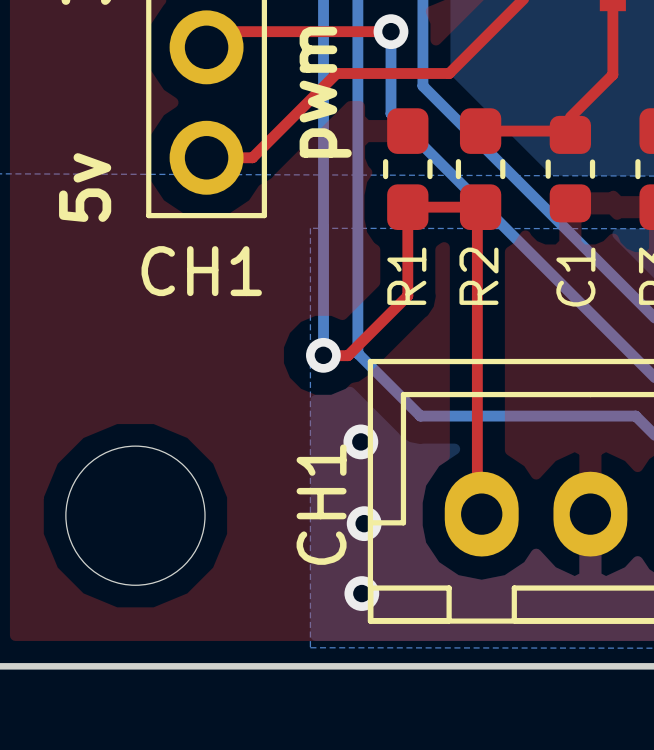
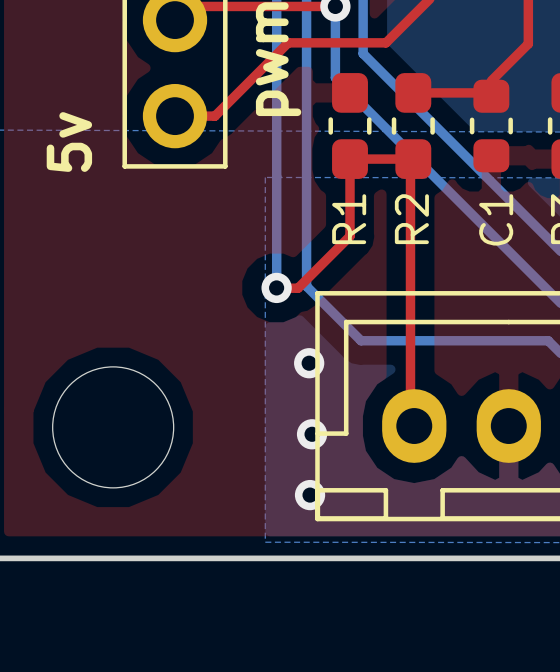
text: CH1 (201, 271) -> none
text: CH1 (321, 504) -> none

